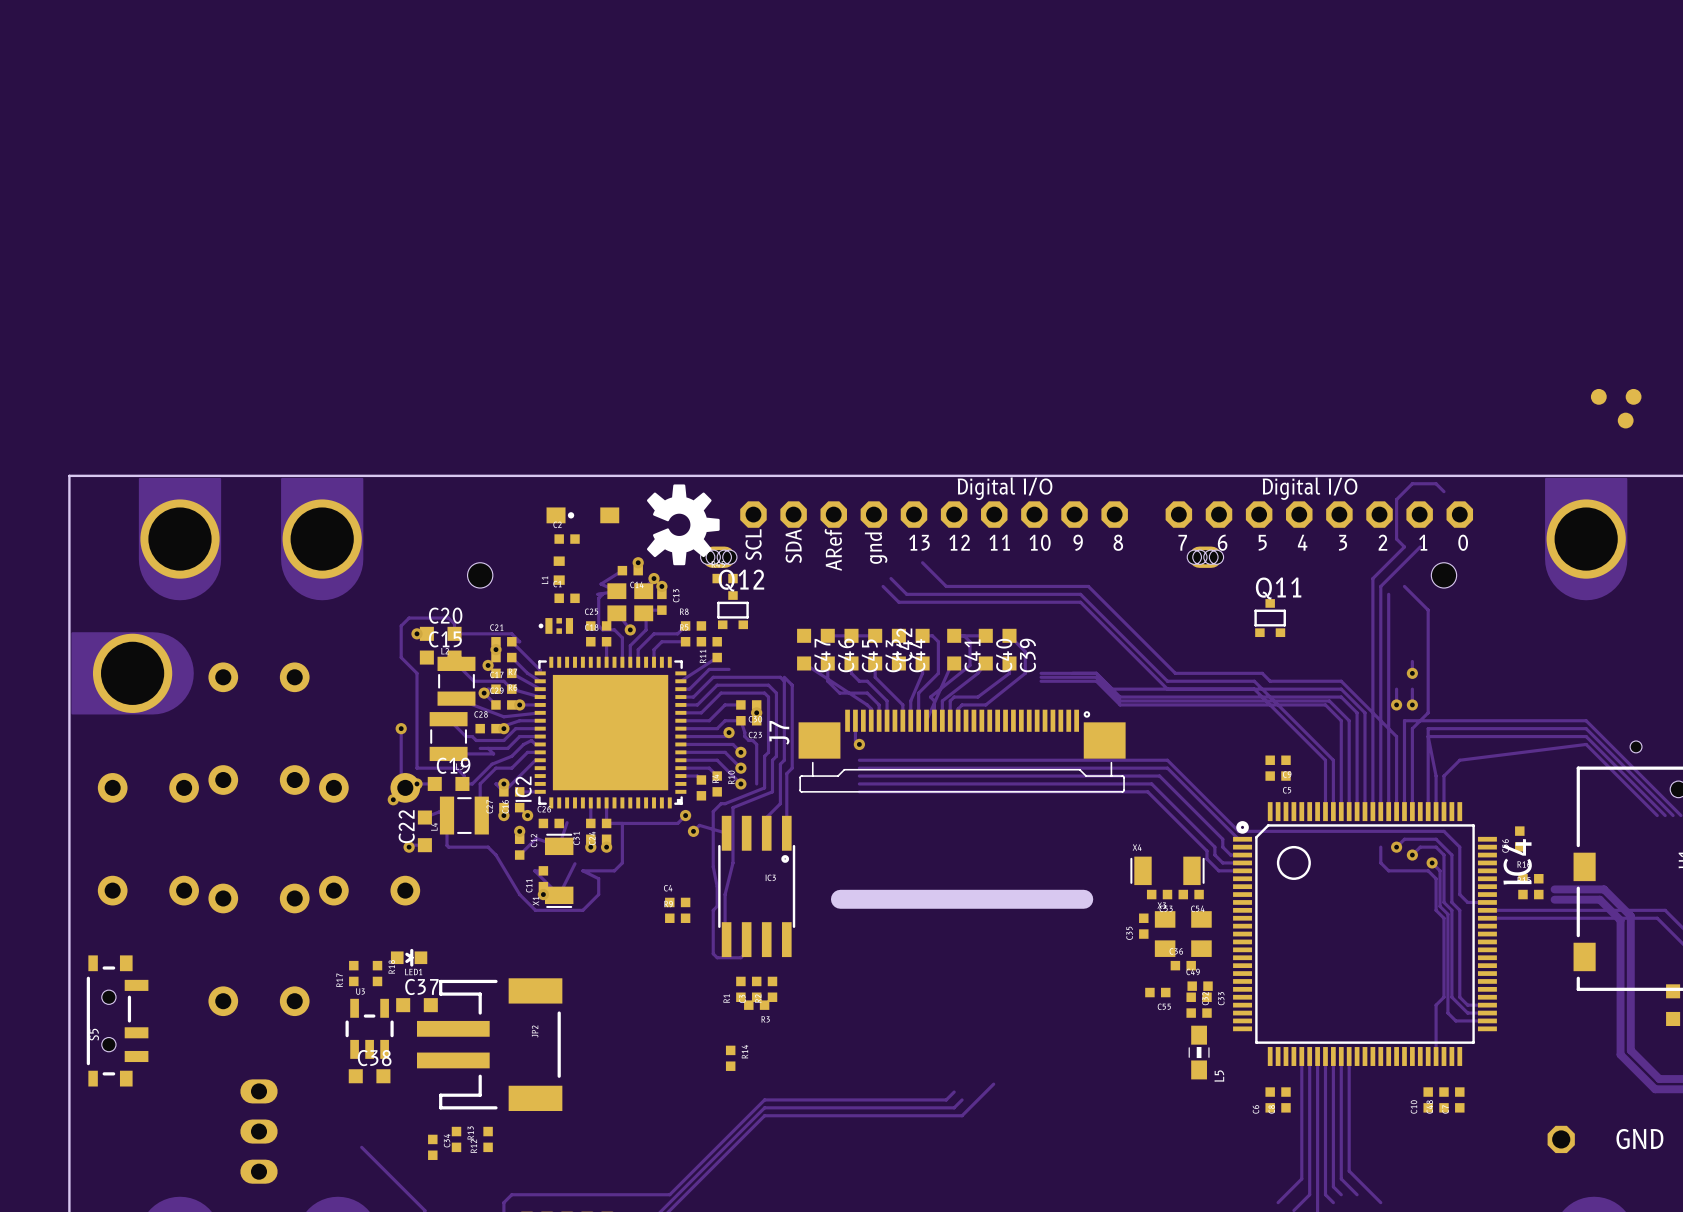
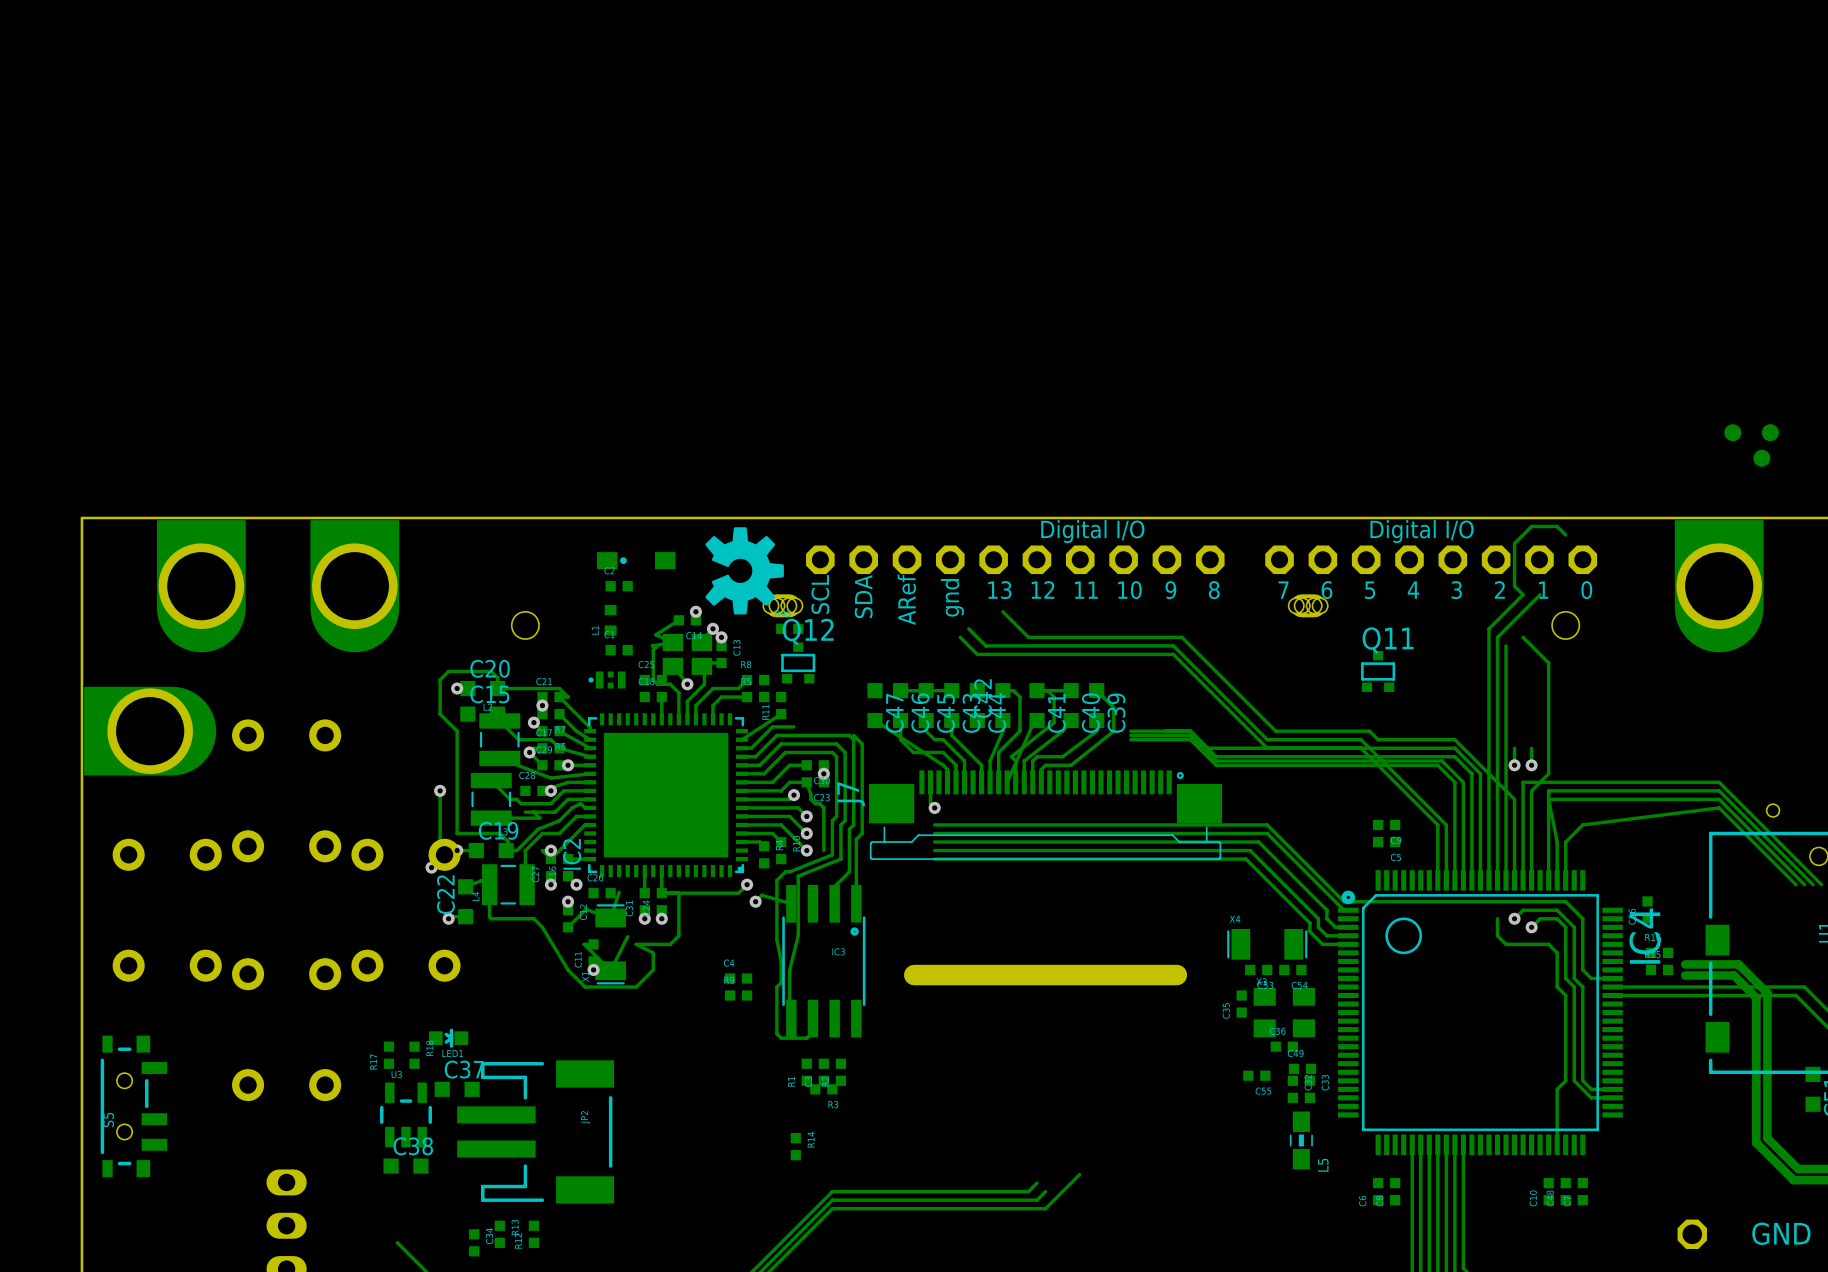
track: (1412, 661) (1412, 673) -> none
via: (1412, 673) -> none
track: (1432, 862) (1440, 870) (1440, 906) (1447, 914) (1447, 1013) (1455, 1020) (1487, 1020) -> none
via: (1432, 862) -> none

